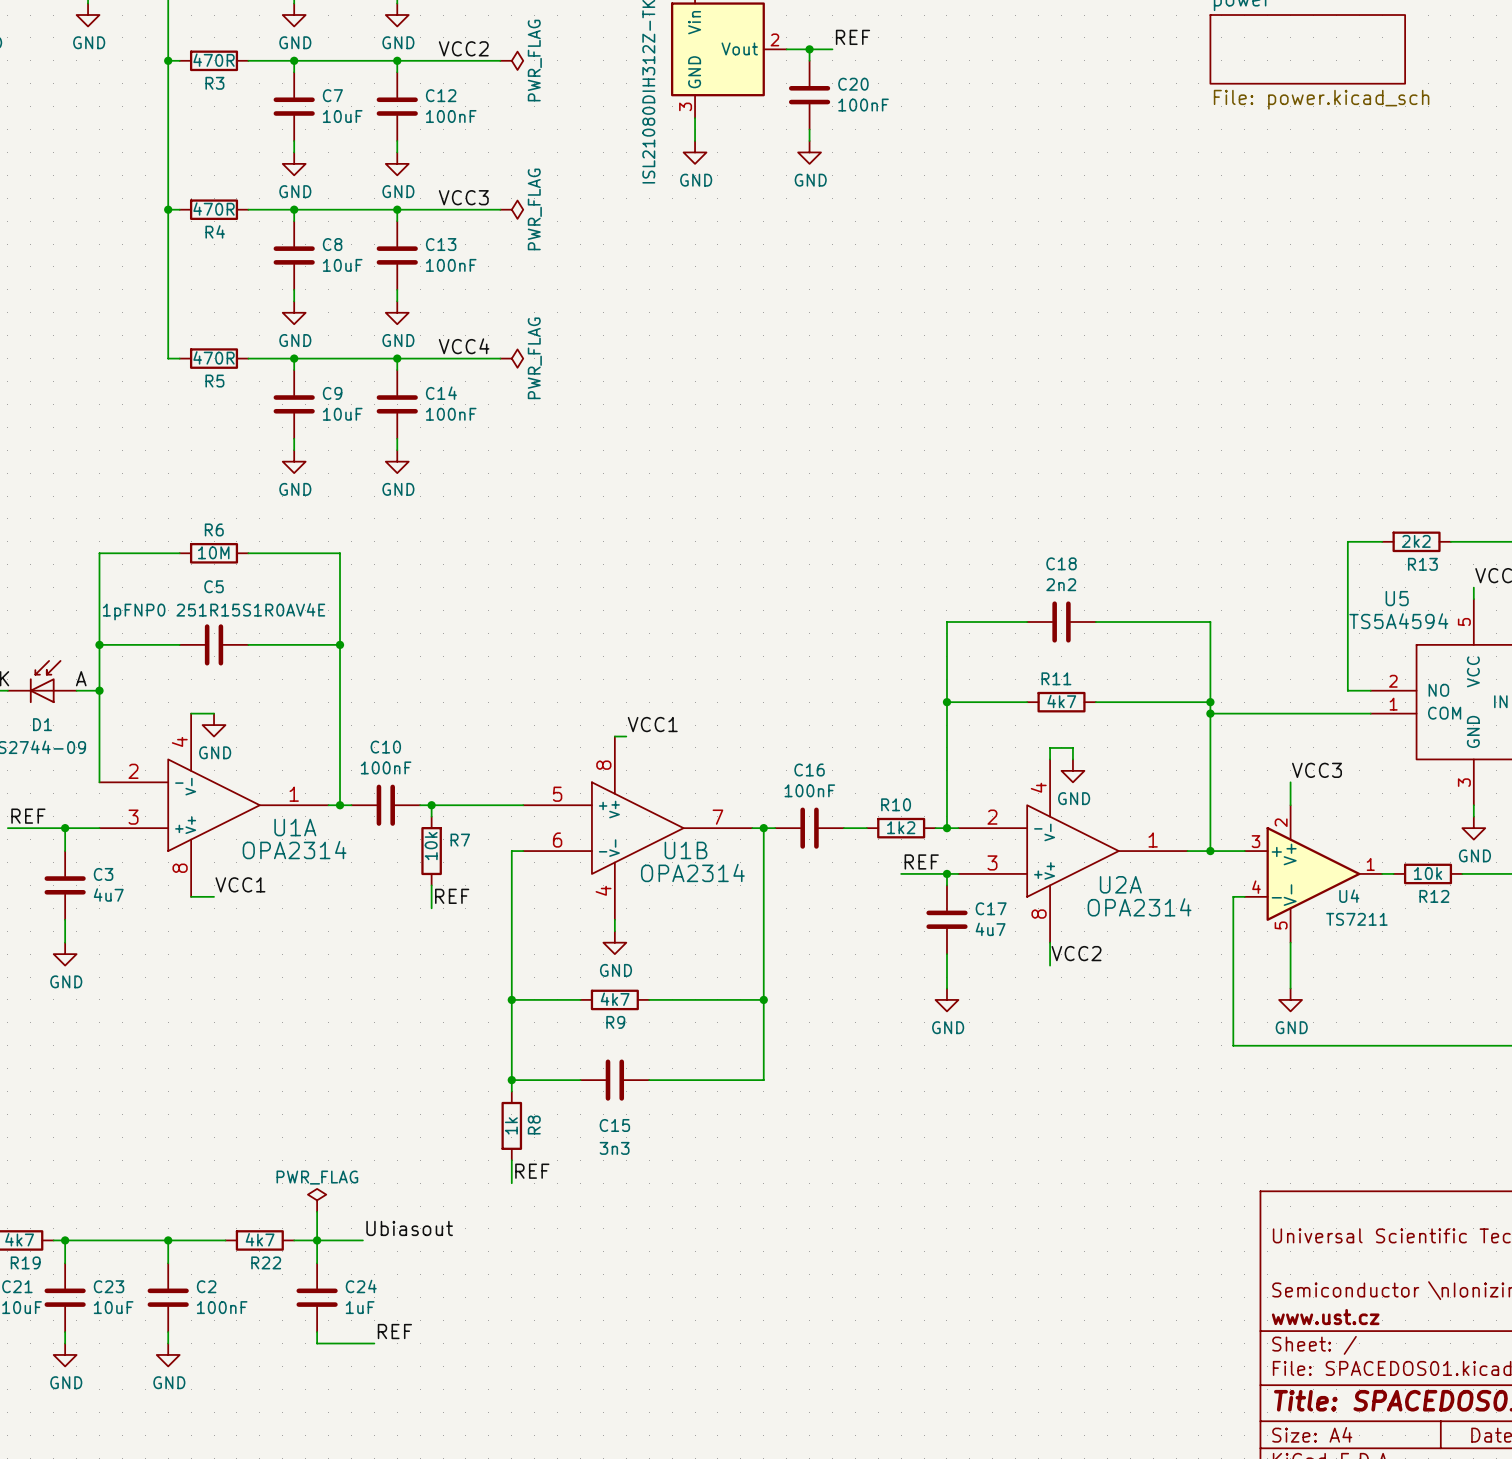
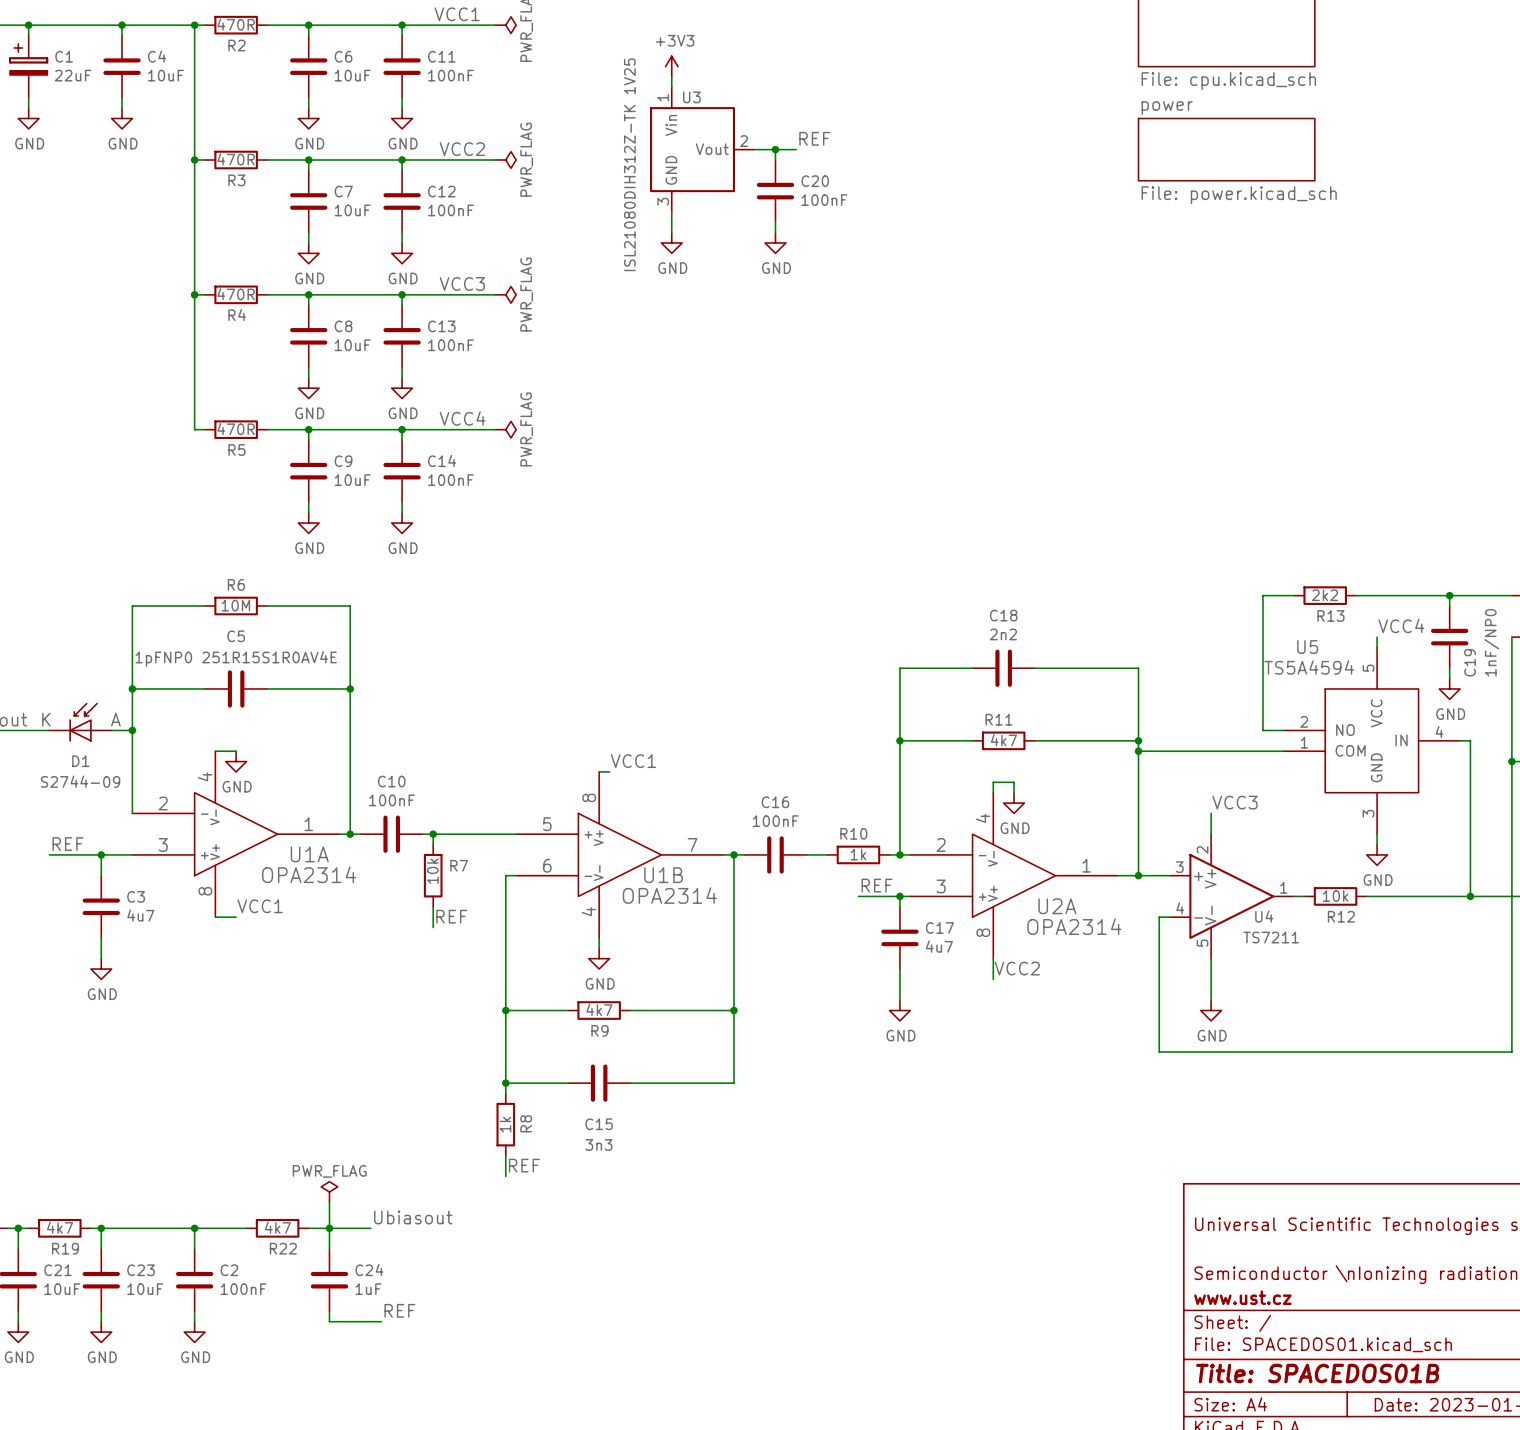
R10 value: 1k2 (901, 827) -> 1k (858, 854)

